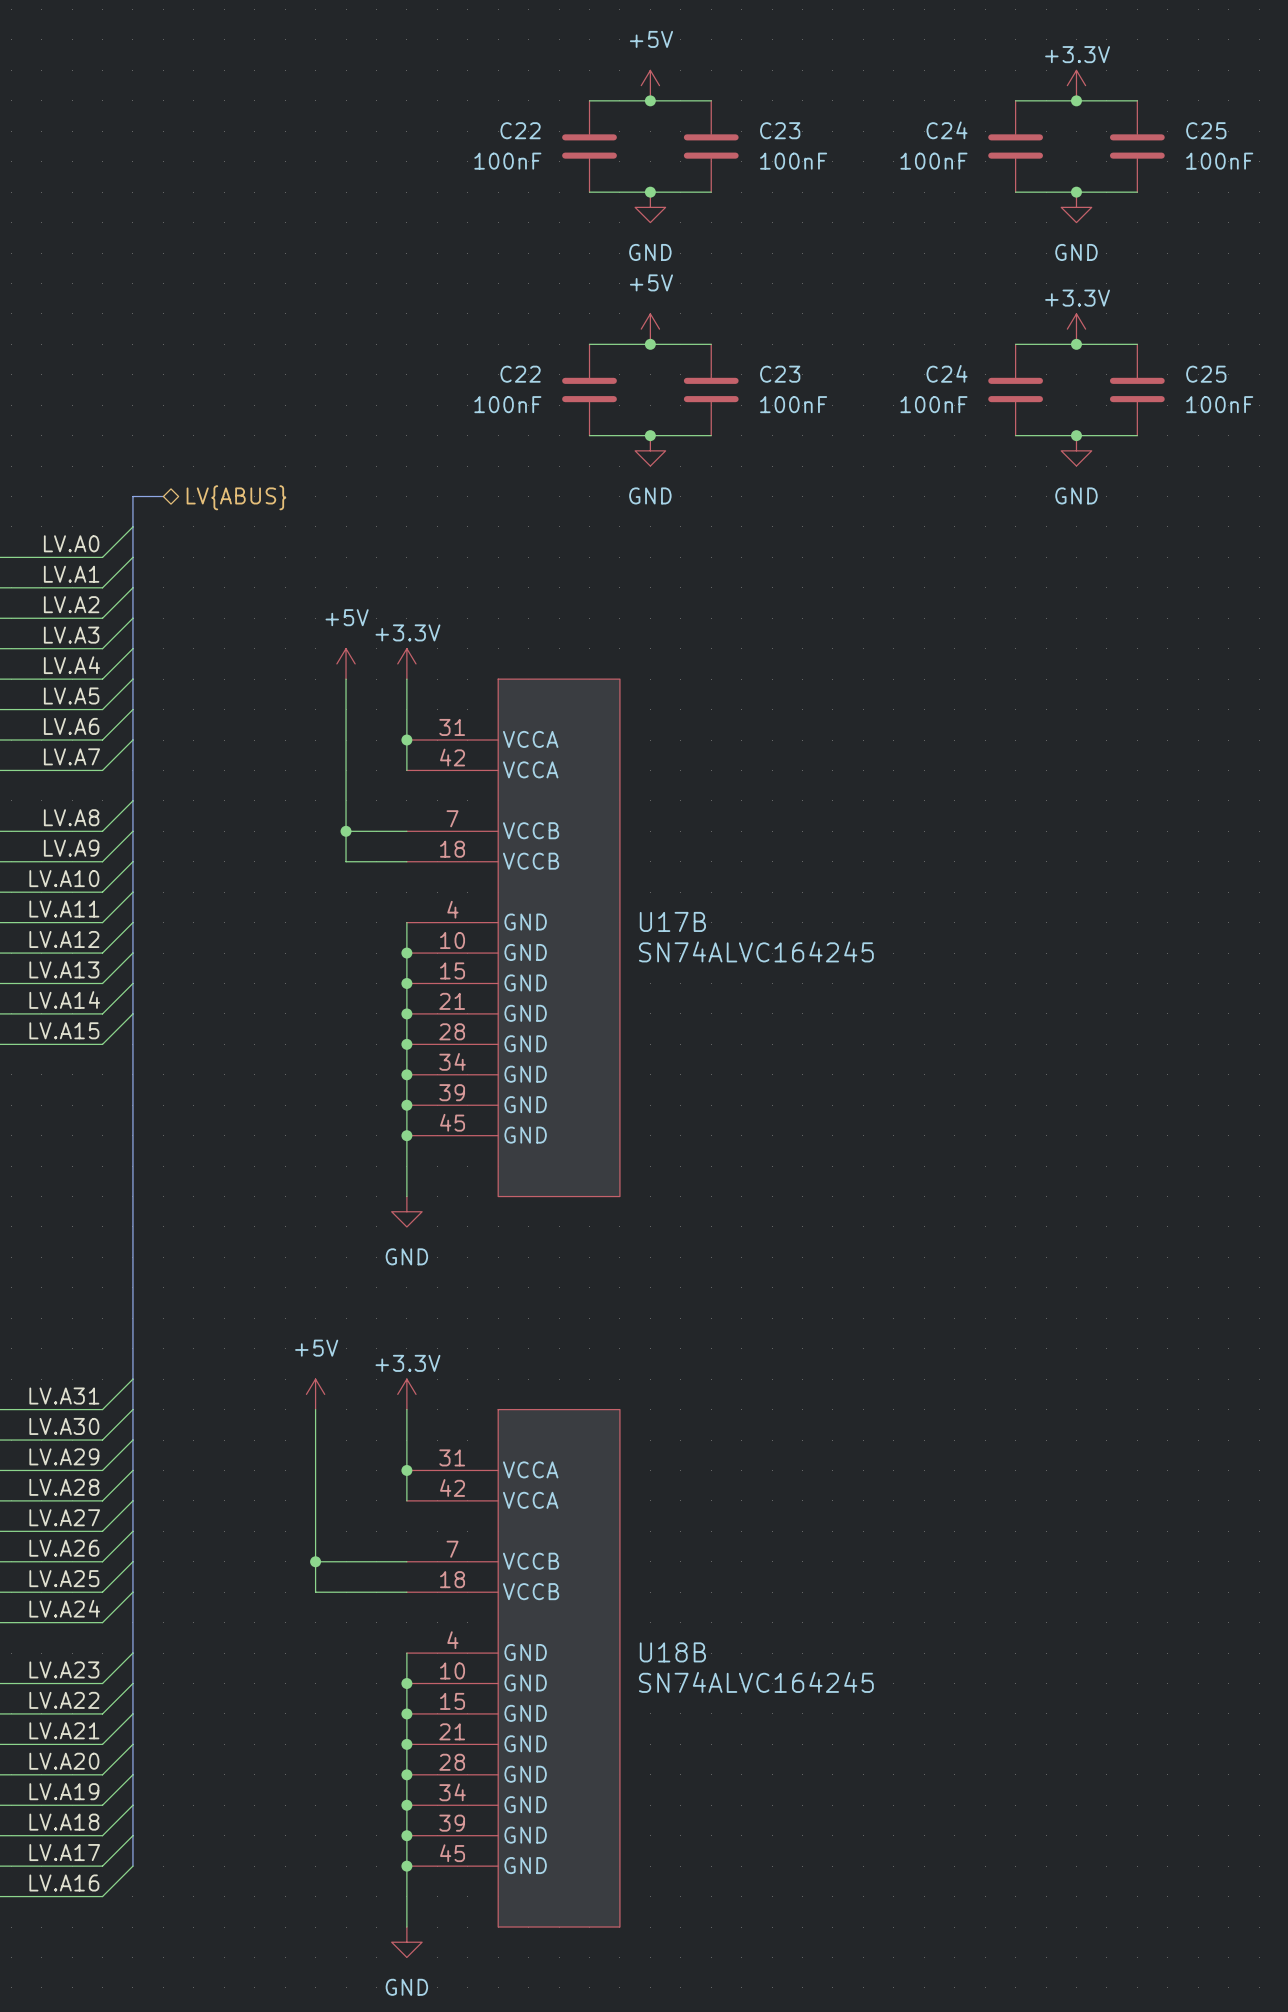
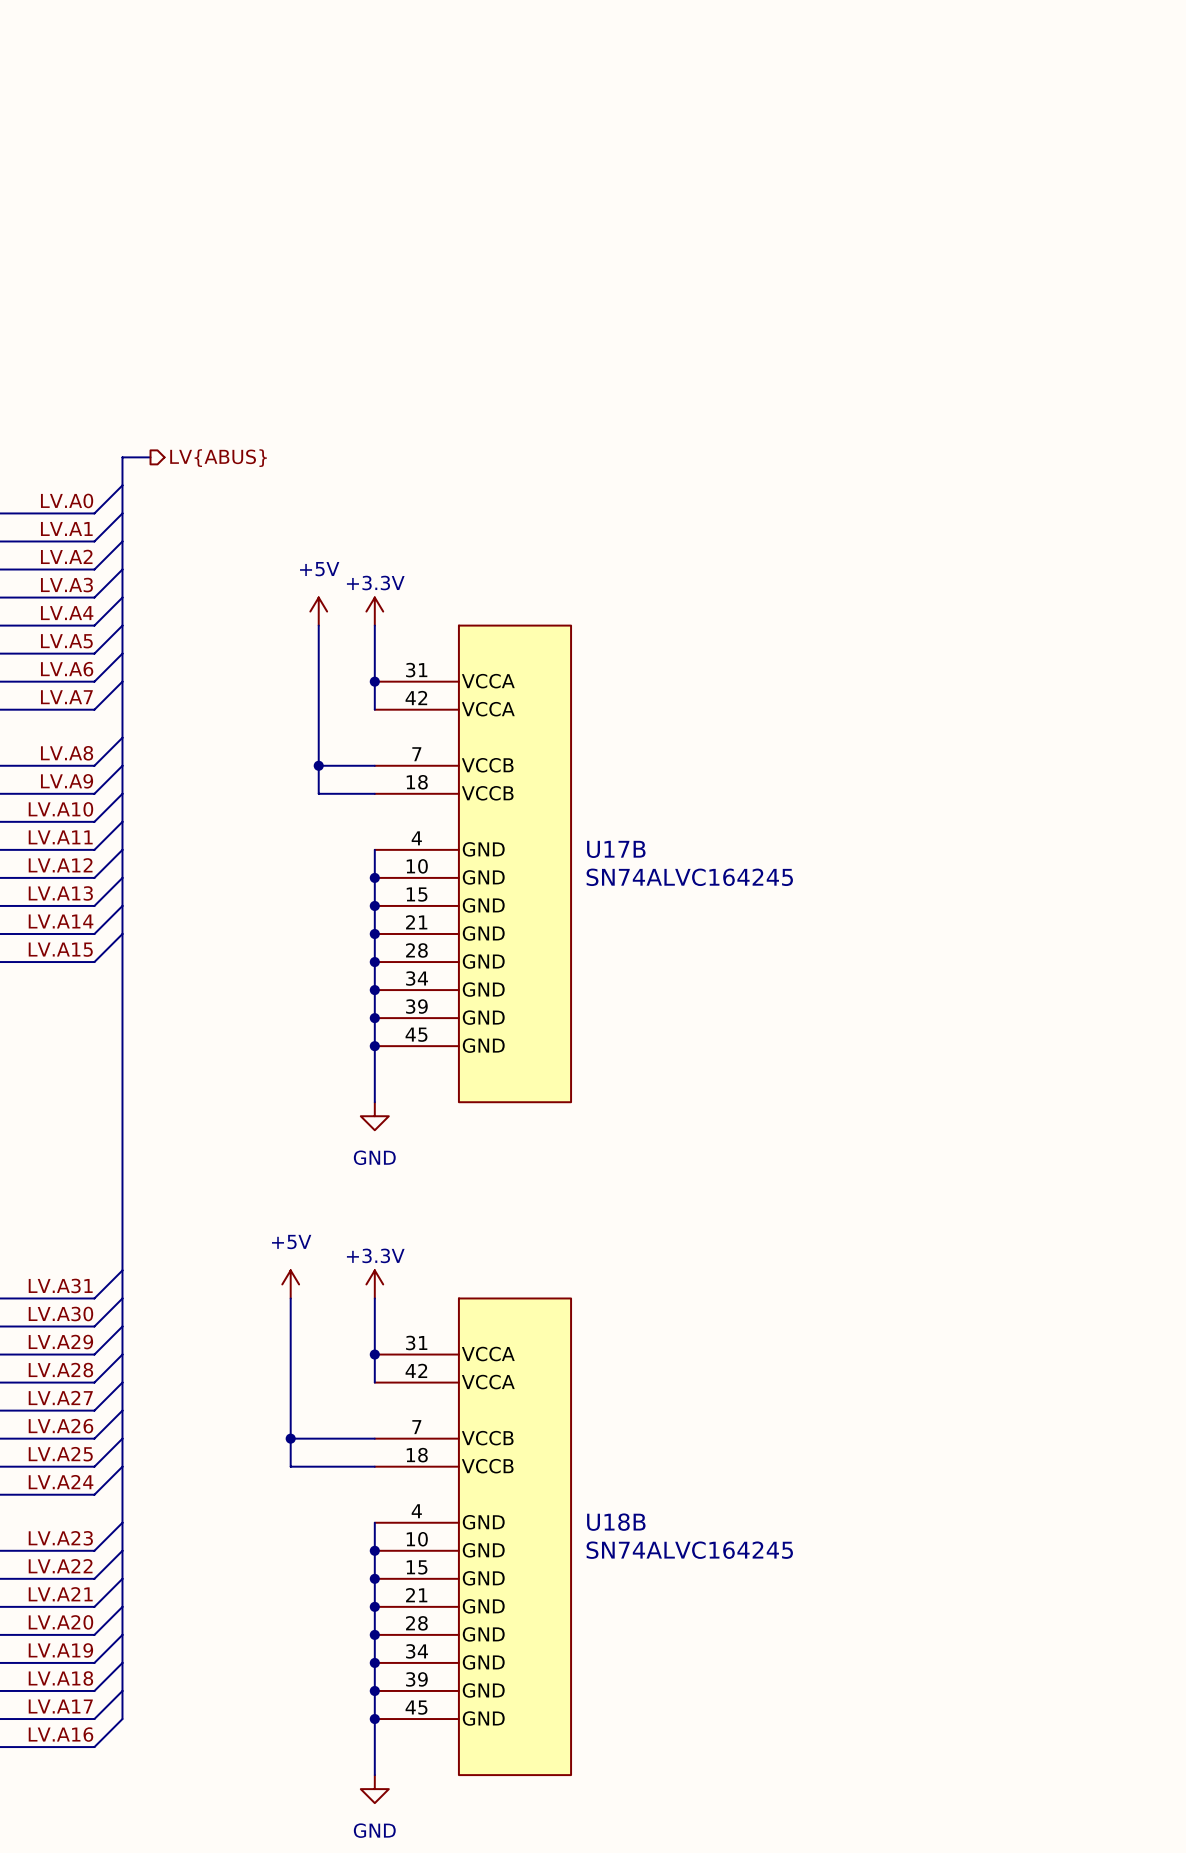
power symbol: +5V (650, 85) -> none
power symbol: +3.3V (1076, 85) -> none
wire: (589, 100) (711, 100) -> none
junction: (650, 100) -> none
wire: (1015, 100) (1137, 100) -> none
junction: (1076, 100) -> none
C22: 100nF (589, 146) -> none
C23: 100nF (711, 146) -> none
C24: 100nF (1015, 146) -> none
C25: 100nF (1137, 146) -> none
wire: (589, 192) (711, 192) -> none
junction: (650, 192) -> none
wire: (1015, 192) (1137, 192) -> none
junction: (1076, 192) -> none
power symbol: GND (650, 207) -> none
power symbol: GND (1076, 207) -> none
power symbol: +5V (650, 329) -> none
power symbol: +3.3V (1076, 329) -> none
wire: (589, 344) (711, 344) -> none
junction: (650, 344) -> none
wire: (1015, 344) (1137, 344) -> none
junction: (1076, 344) -> none
C22: 100nF (589, 389) -> none
C23: 100nF (711, 389) -> none
C24: 100nF (1015, 389) -> none
C25: 100nF (1137, 389) -> none
wire: (589, 435) (711, 435) -> none
junction: (650, 435) -> none
wire: (1015, 435) (1137, 435) -> none
junction: (1076, 435) -> none
power symbol: GND (650, 450) -> none
power symbol: GND (1076, 450) -> none
hierarchical label shape: bidirectional (236, 497) -> output (218, 458)

